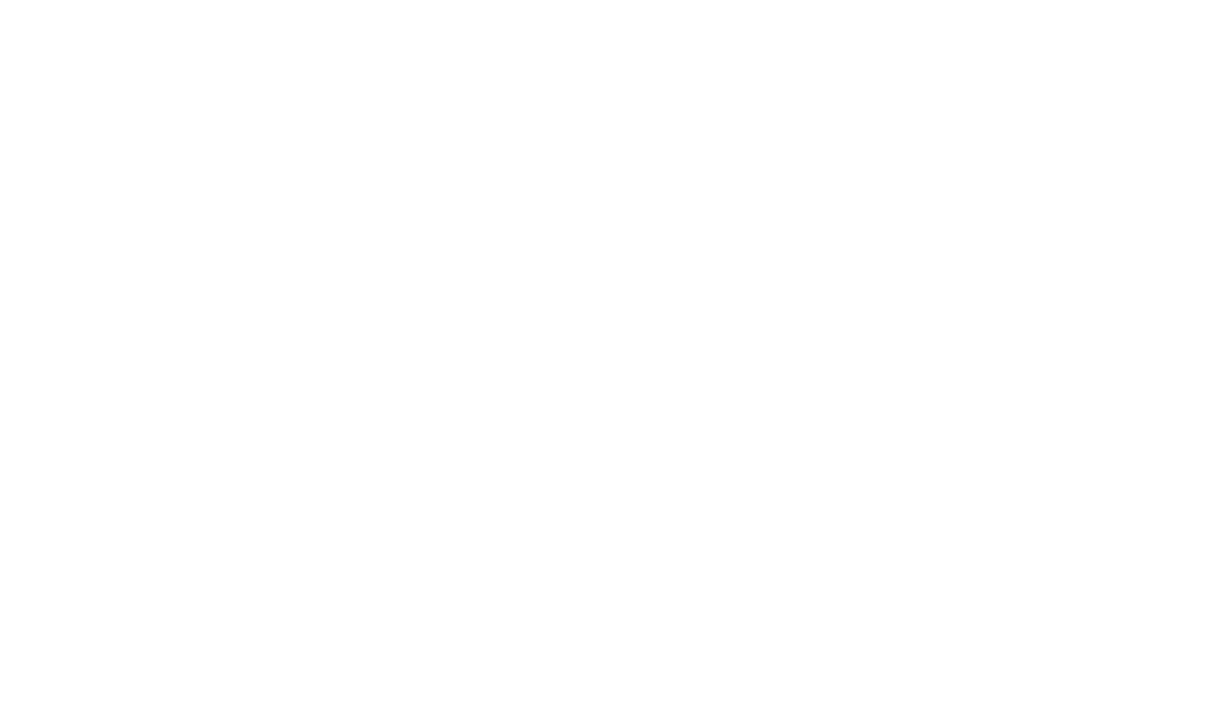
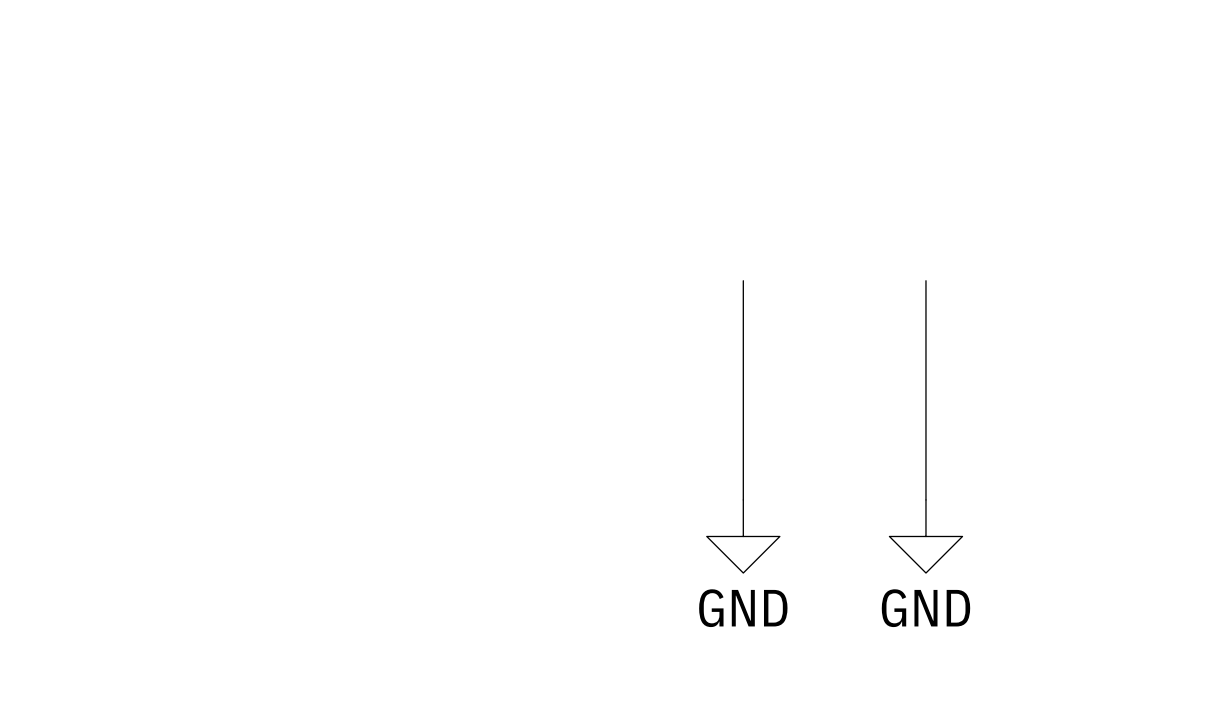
wire: none -> (743, 280) (743, 499)
wire: none -> (925, 280) (925, 499)
power symbol: none -> GND (743, 536)
power symbol: none -> GND (925, 536)

